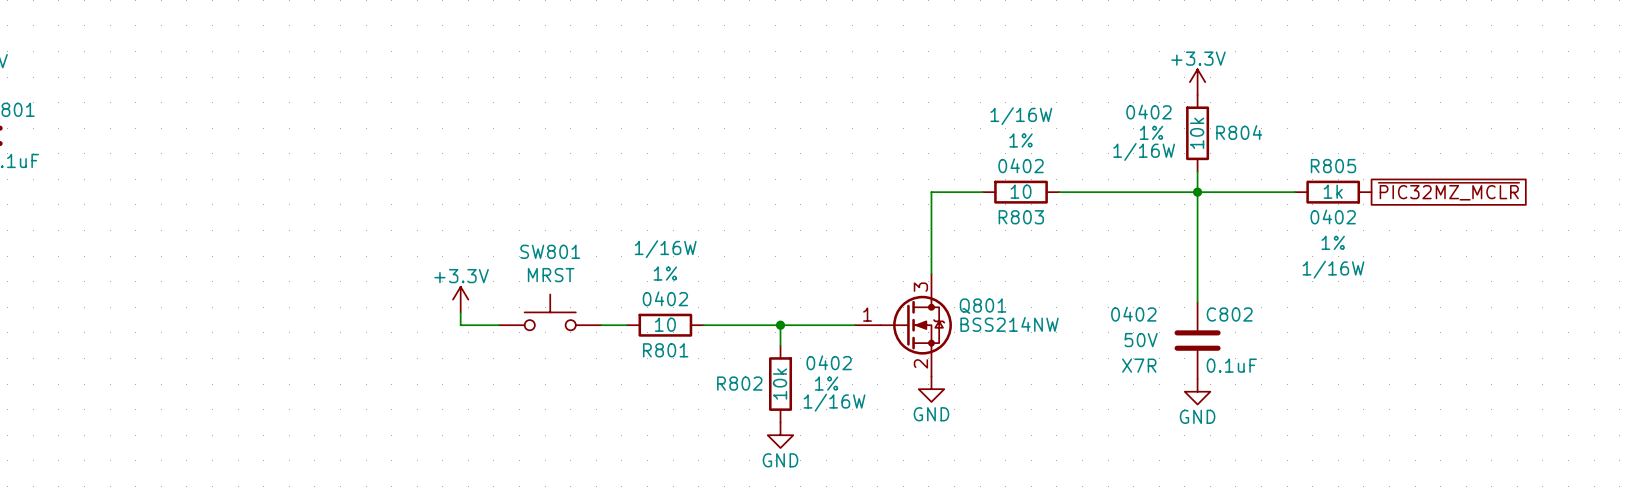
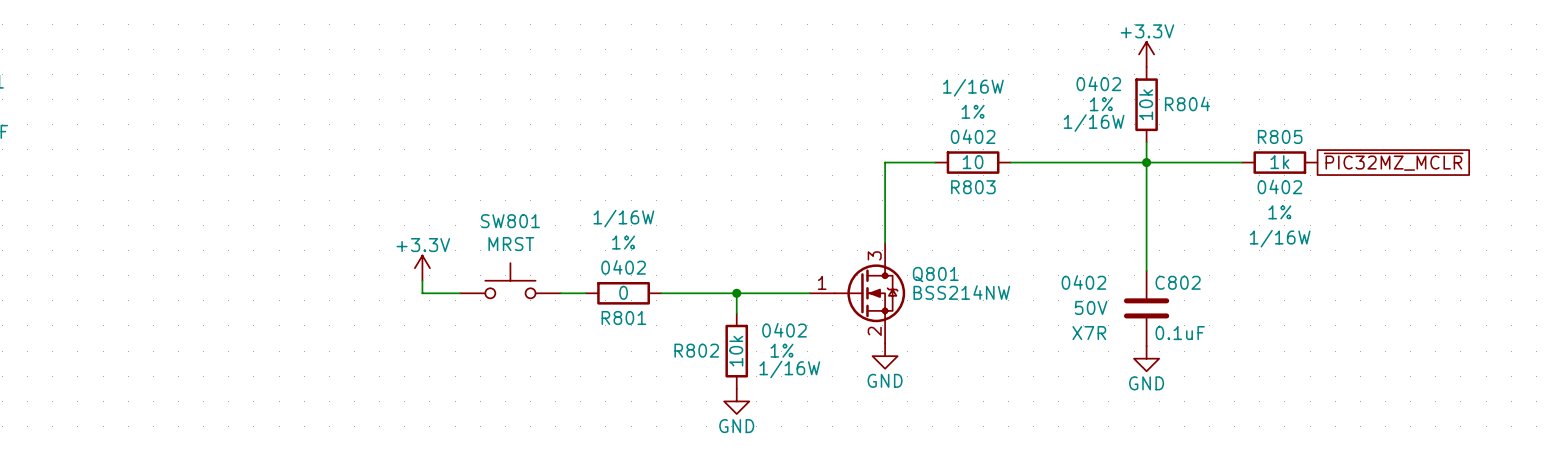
R801 value: 10 (665, 324) -> 0 (623, 292)

